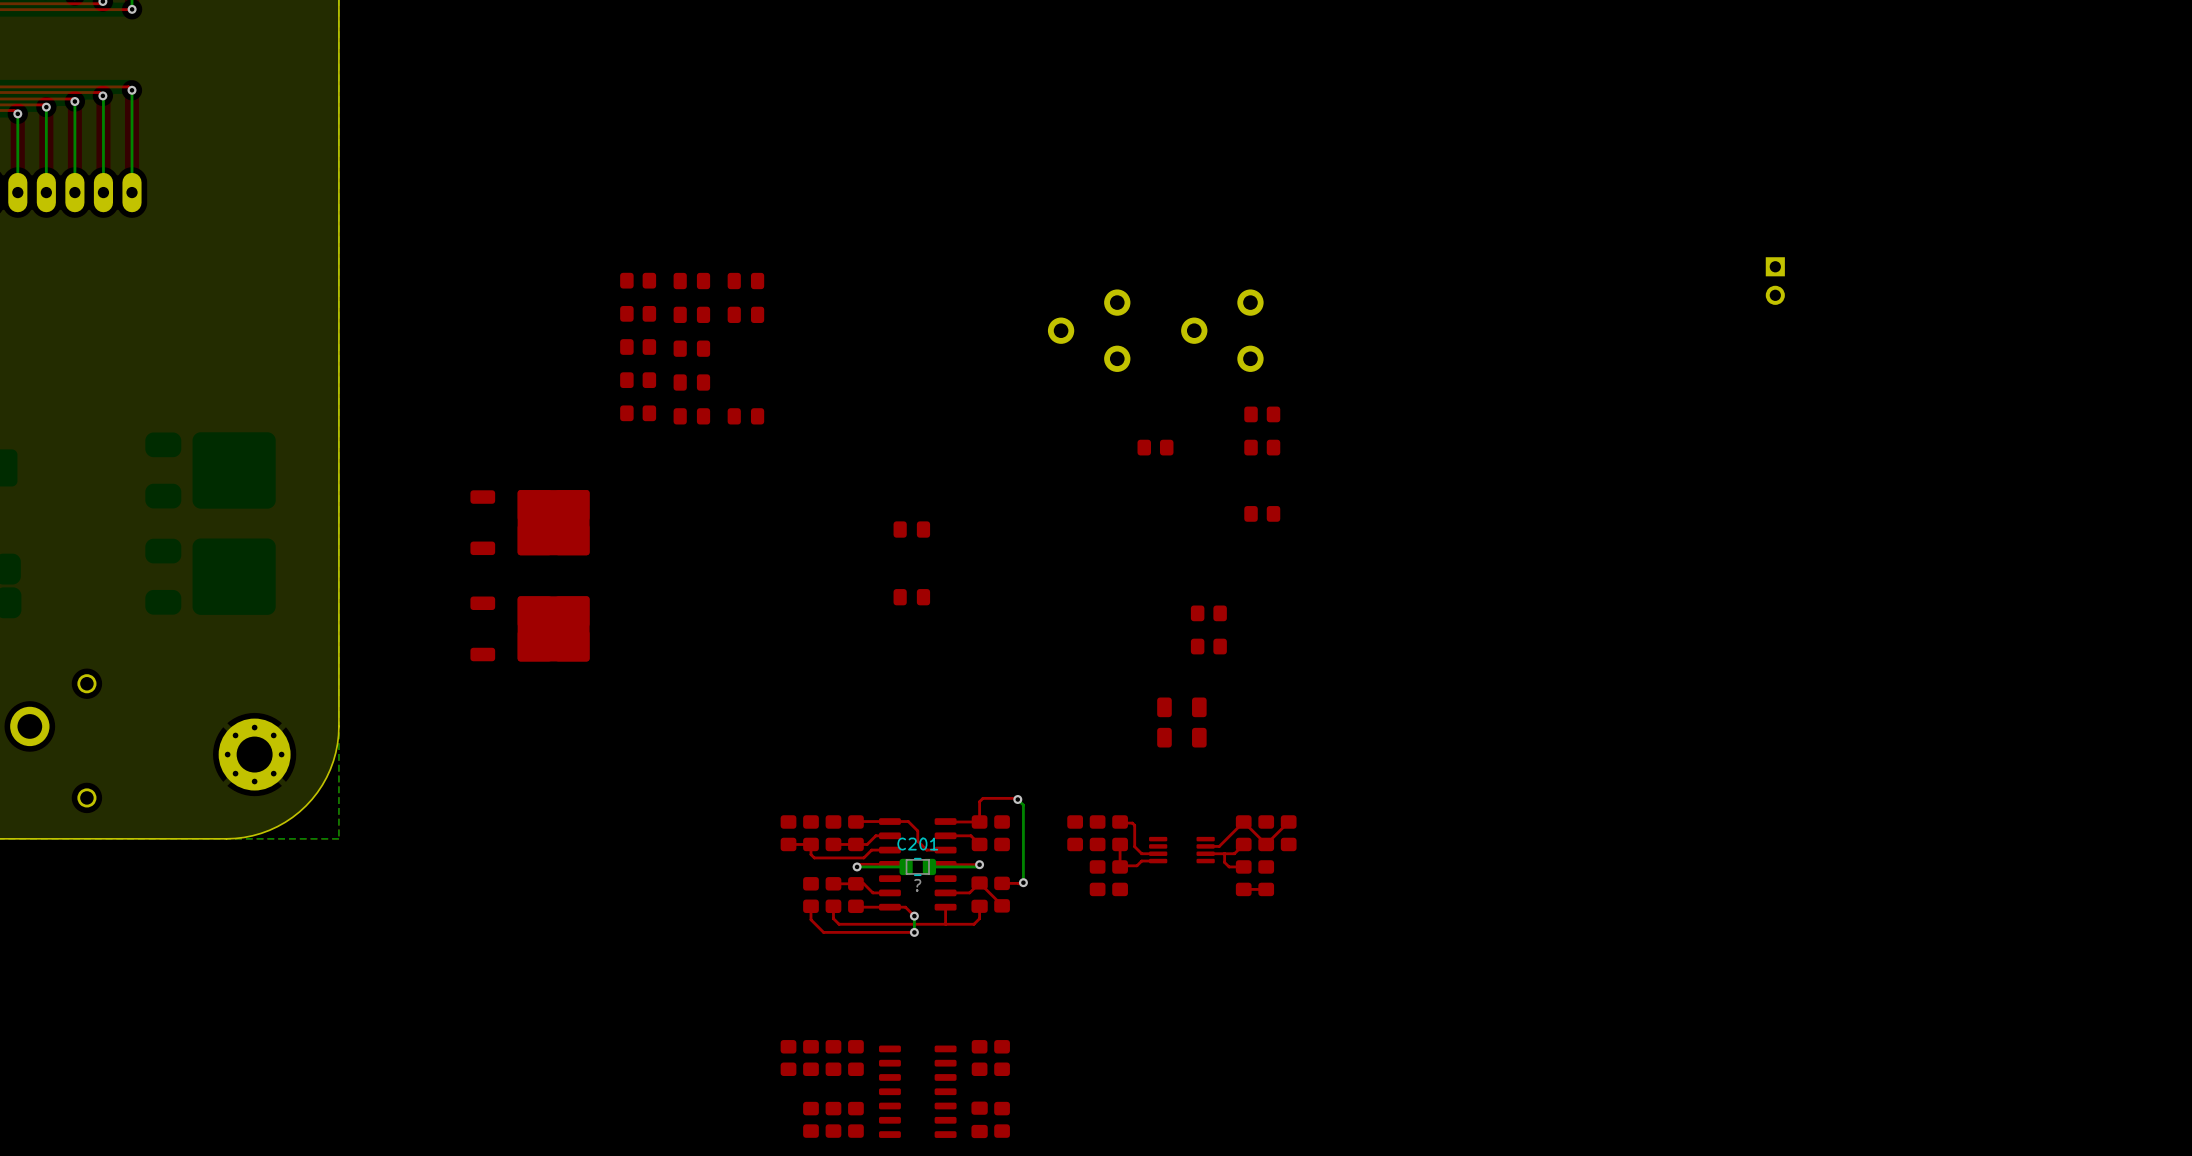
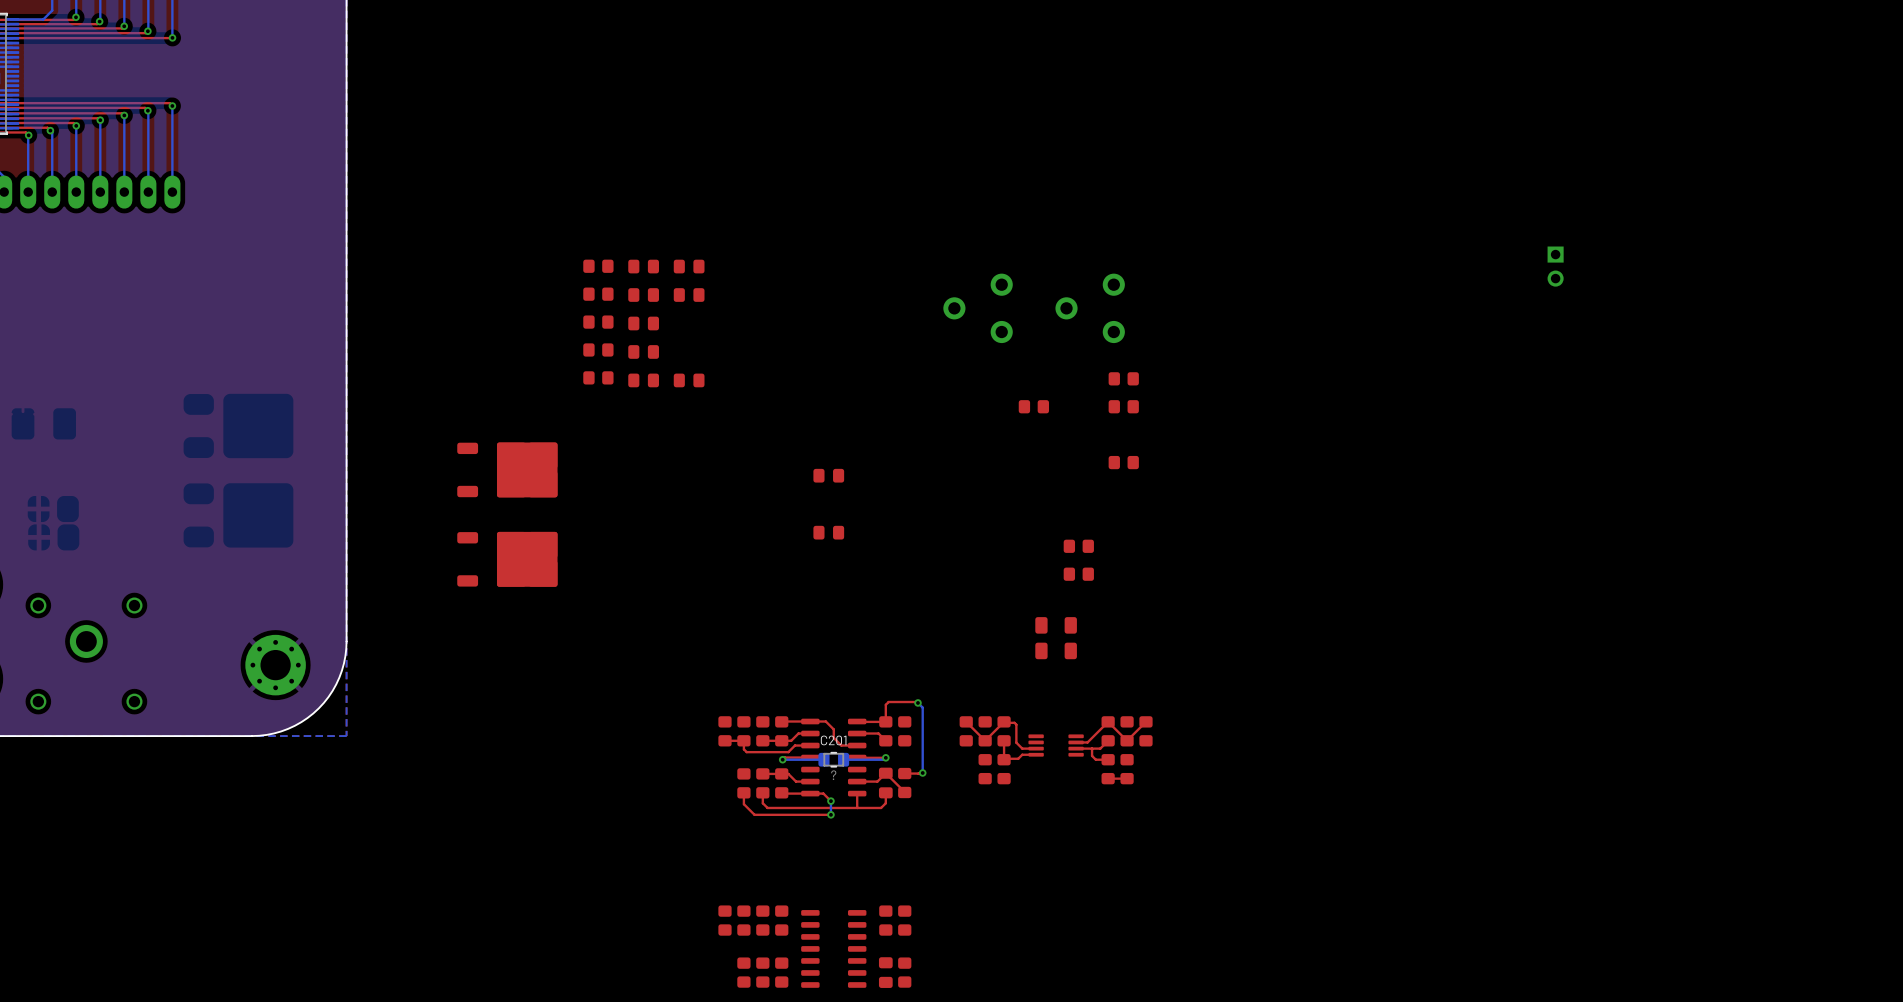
top track: none -> (1004, 721) (985, 740) (966, 721)

